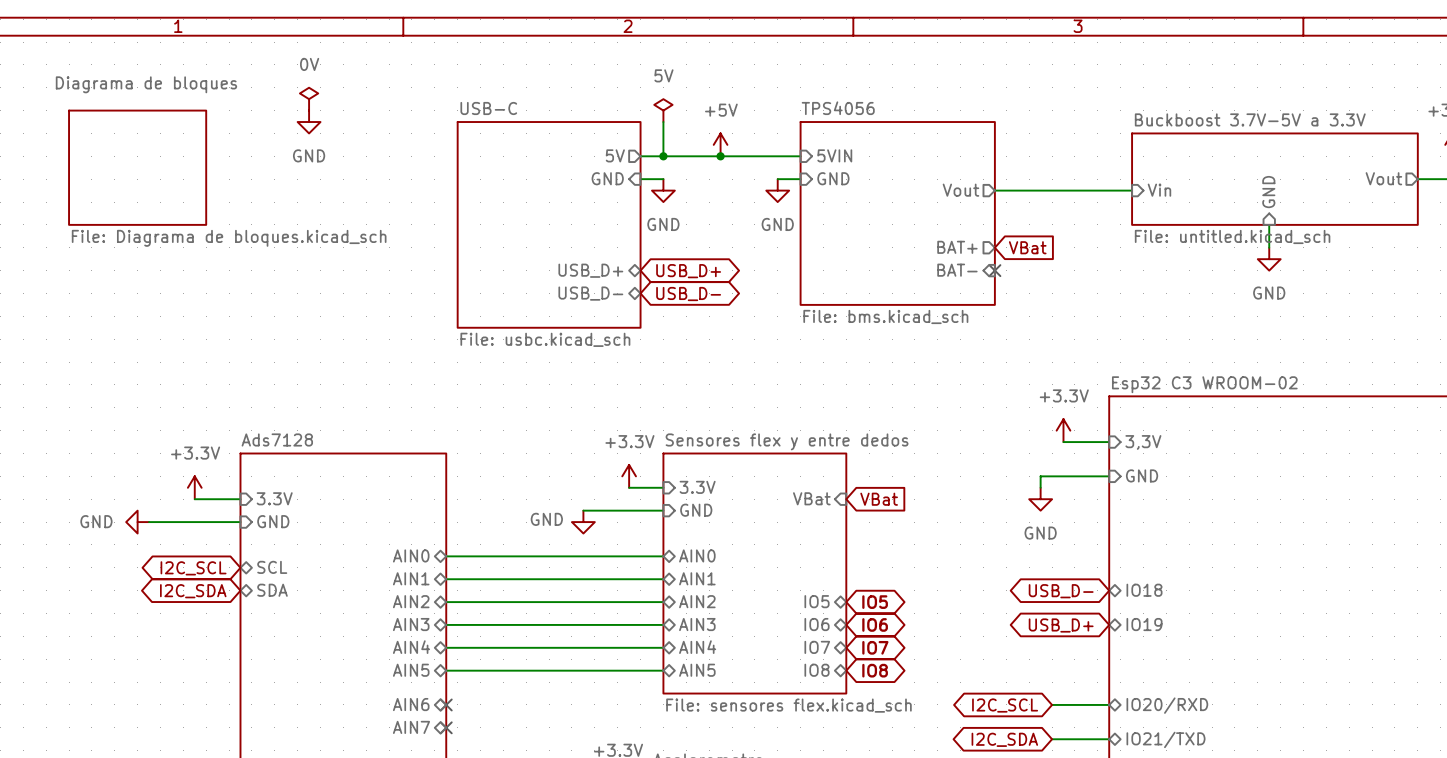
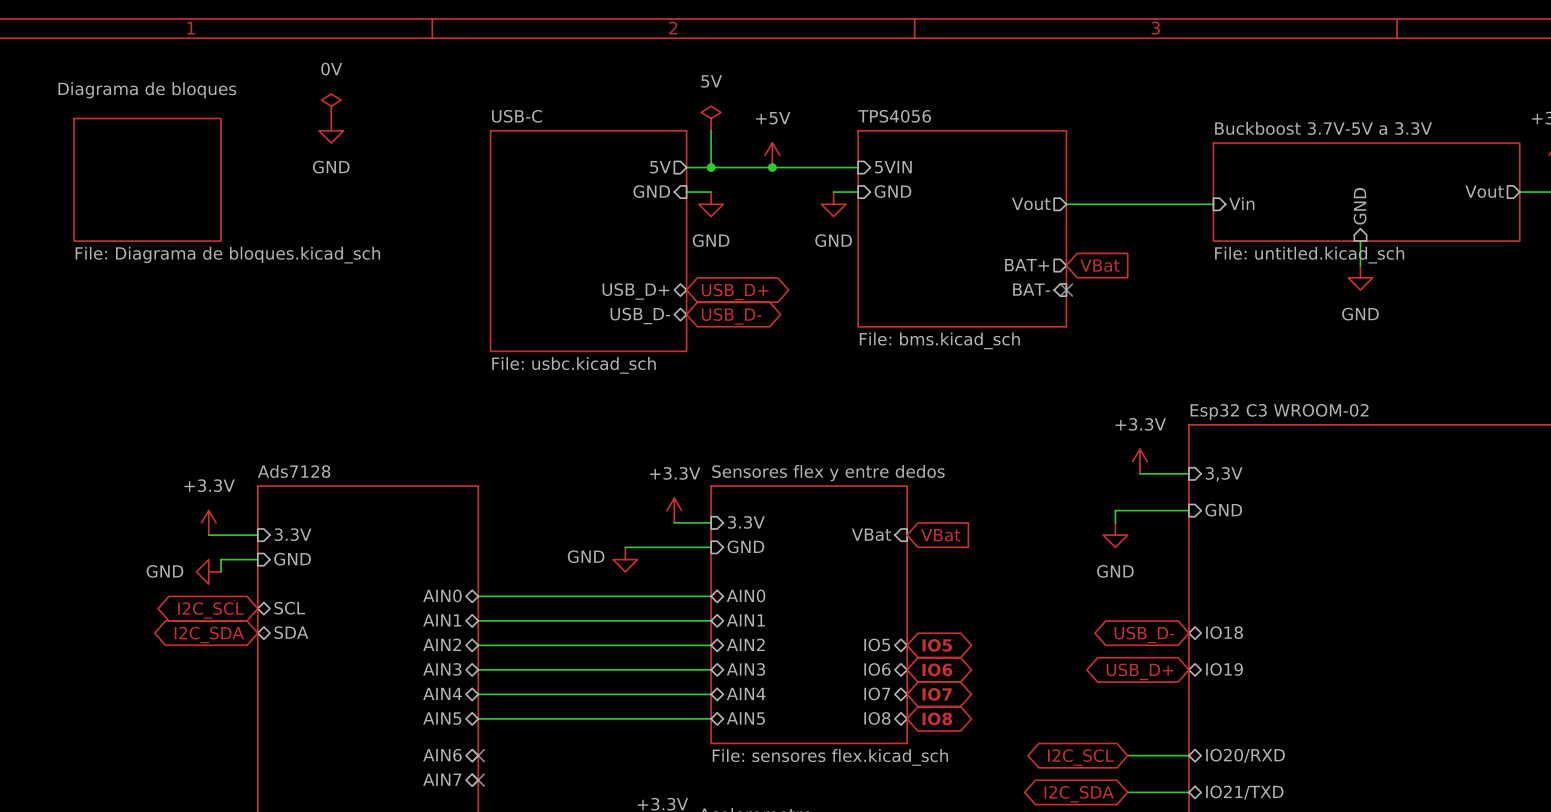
power symbol position: GND (137, 522) -> GND (208, 571)
wire: (149, 522) (206, 522) -> (221, 571) (221, 559)

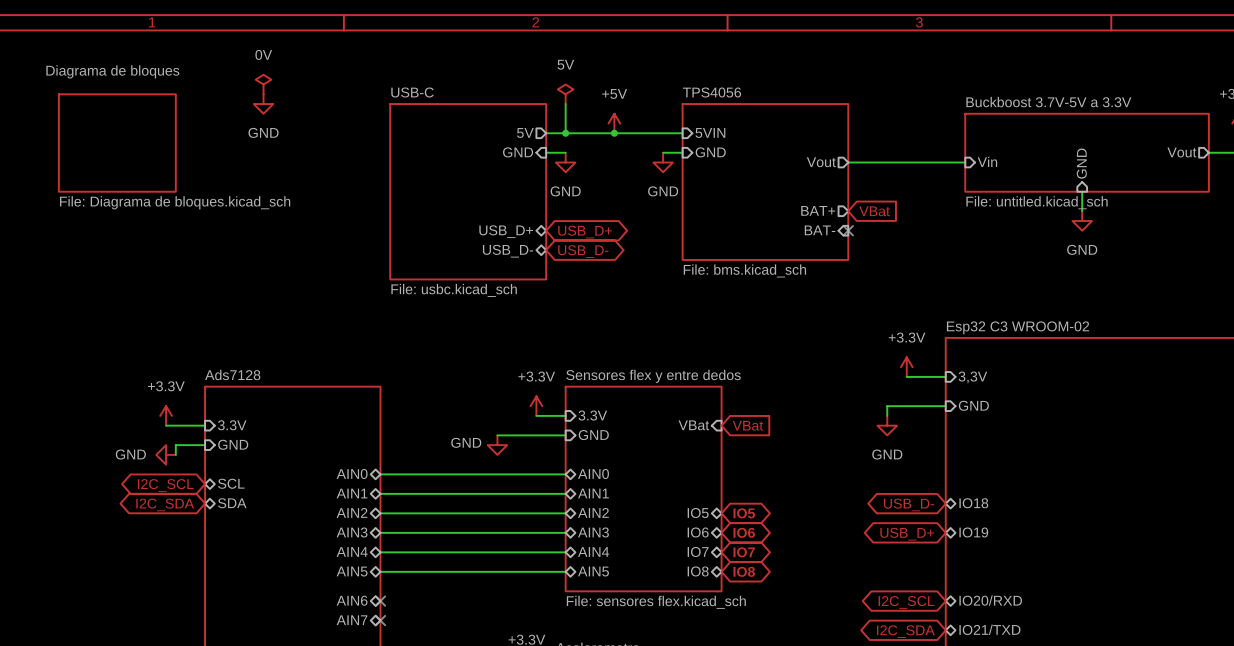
wire: (1127, 755) (1188, 755) -> none
global label position: I2C_SCL (1080, 757) -> I2C_SCL (906, 602)
wire: (1127, 792) (1188, 792) -> none
global label position: I2C_SDA (1079, 794) -> I2C_SDA (905, 631)

